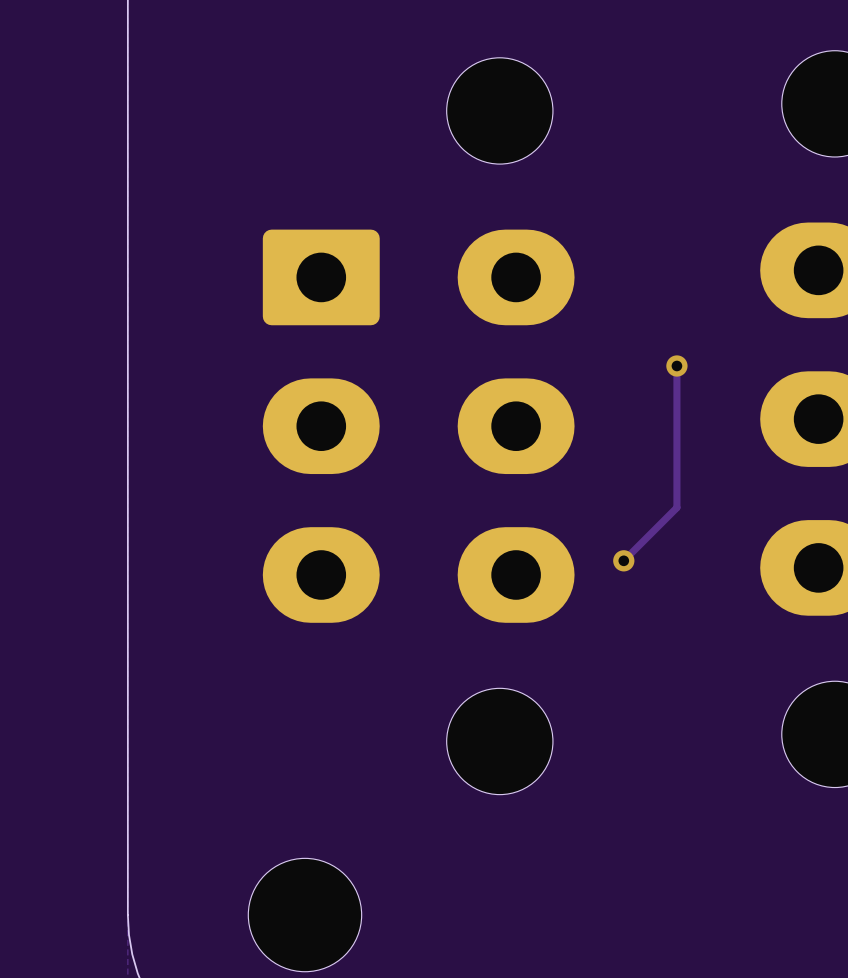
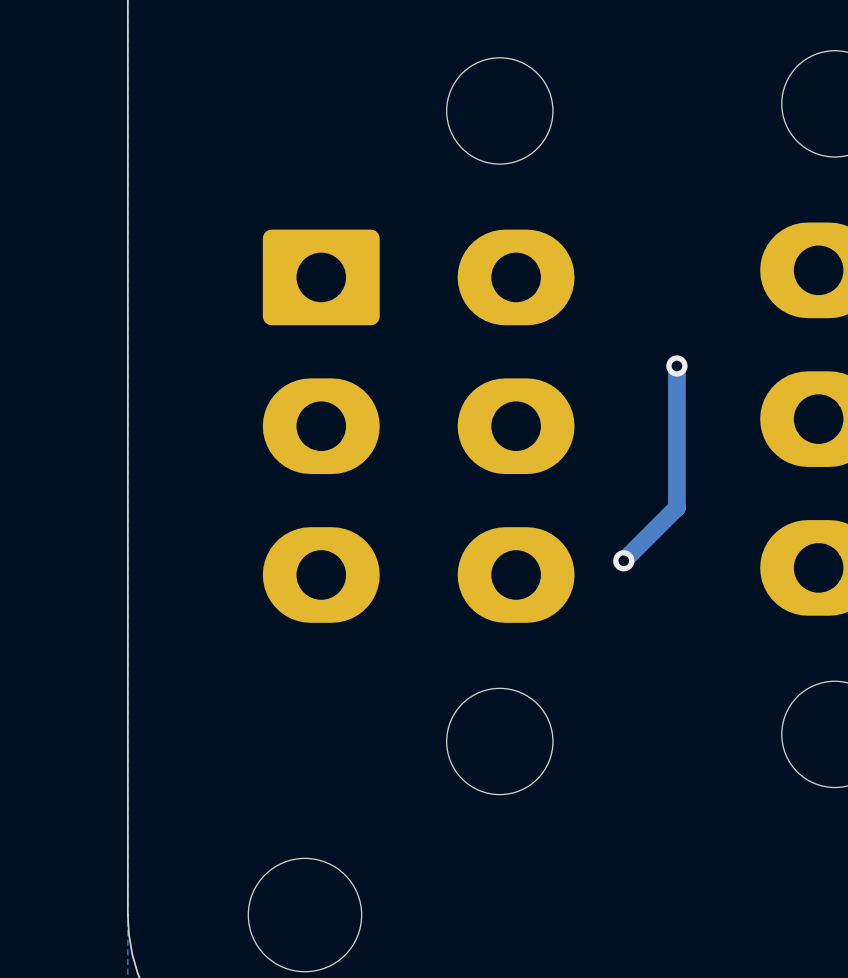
track width: thin (676, 365) (676, 507) (623, 560) -> thick (676, 365) (676, 507) (623, 560)

